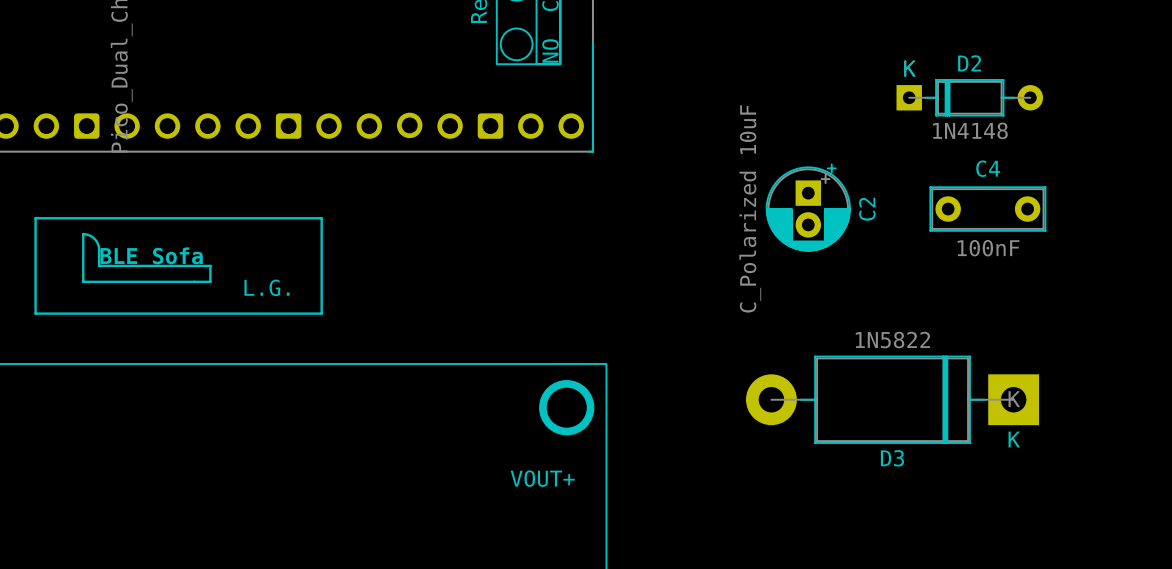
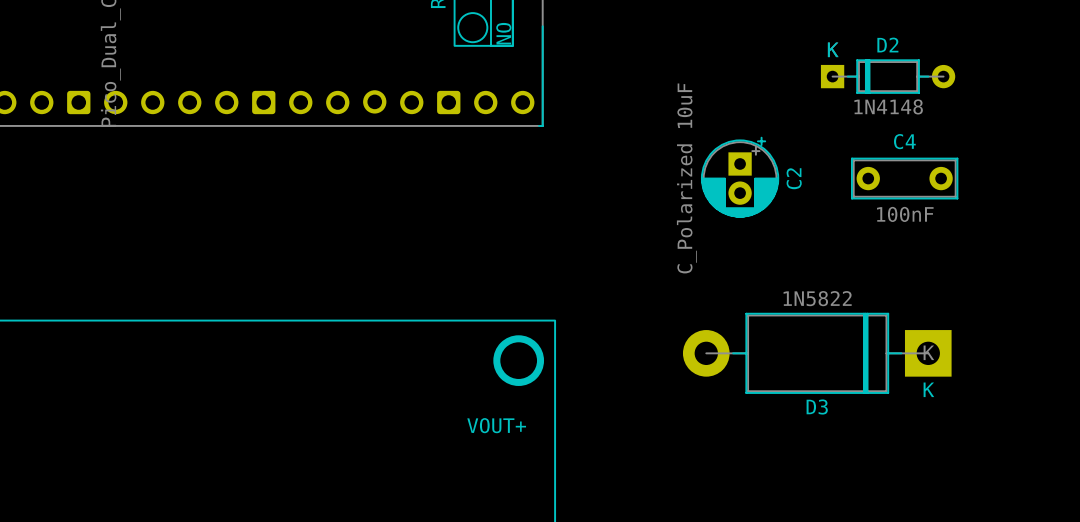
line: (35, 218) (321, 218) (321, 313) (35, 313) (35, 218) -> none
line: (83, 234) (83, 281) (210, 281) (210, 265) (99, 265) (97, 243) (91, 236) (83, 234) -> none
text: BLE Sofa (151, 255) -> none
text: L.G. (266, 287) -> none

